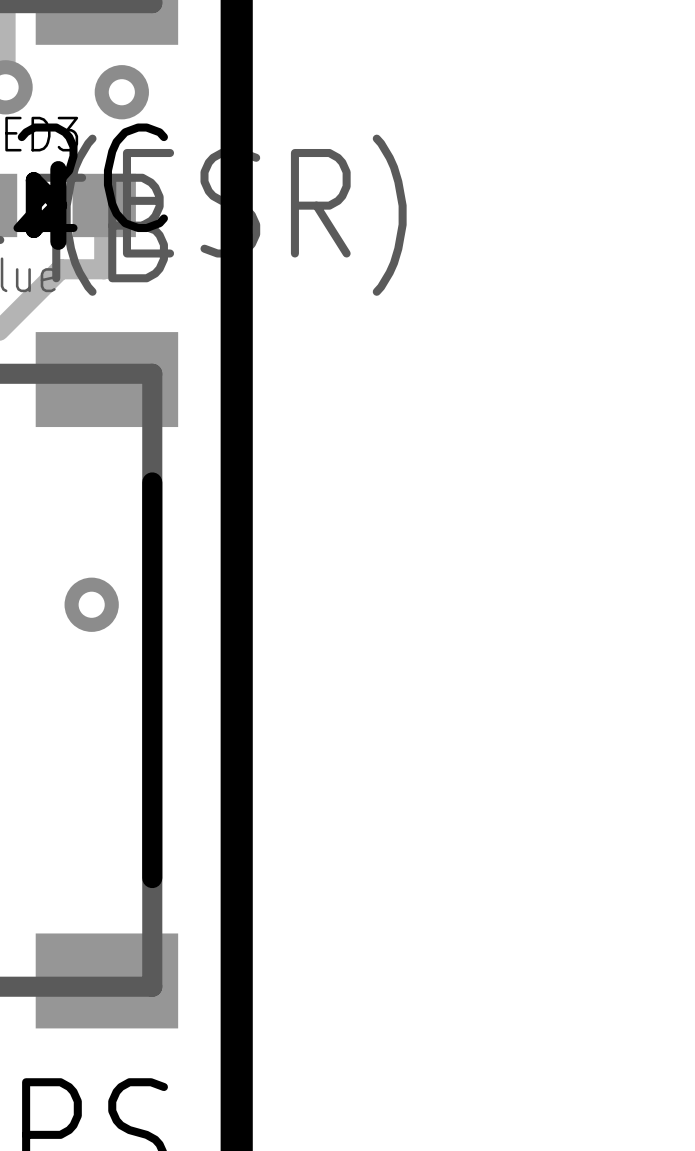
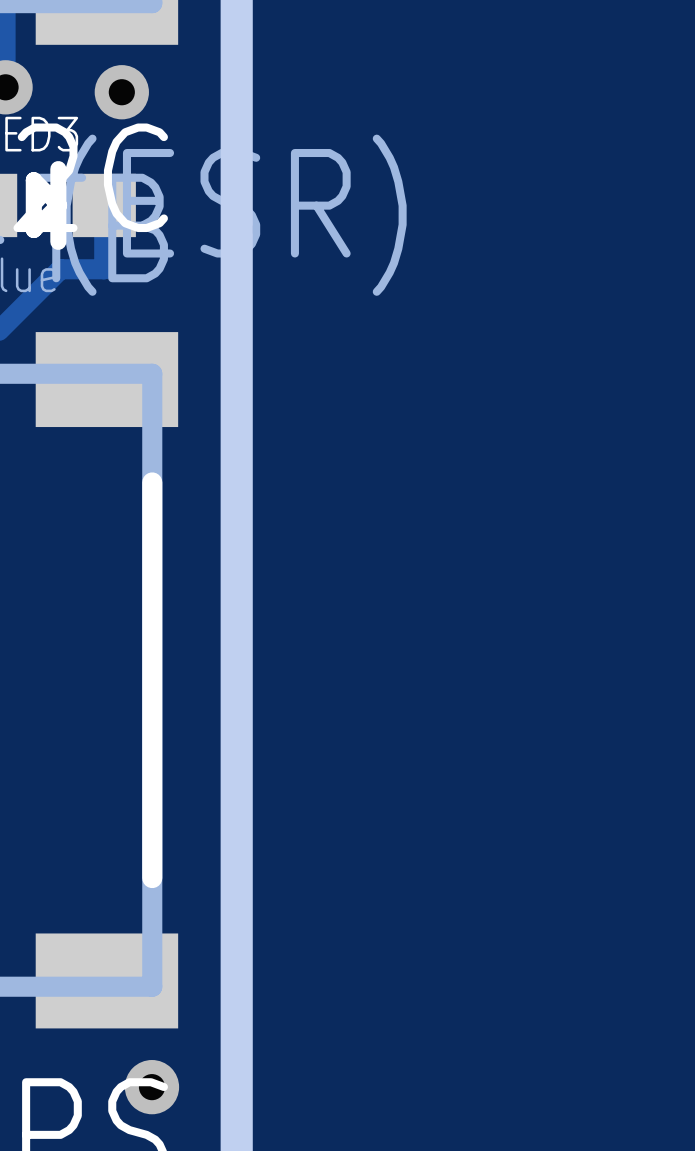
via: (91, 604) -> none
via: none -> (151, 1087)

